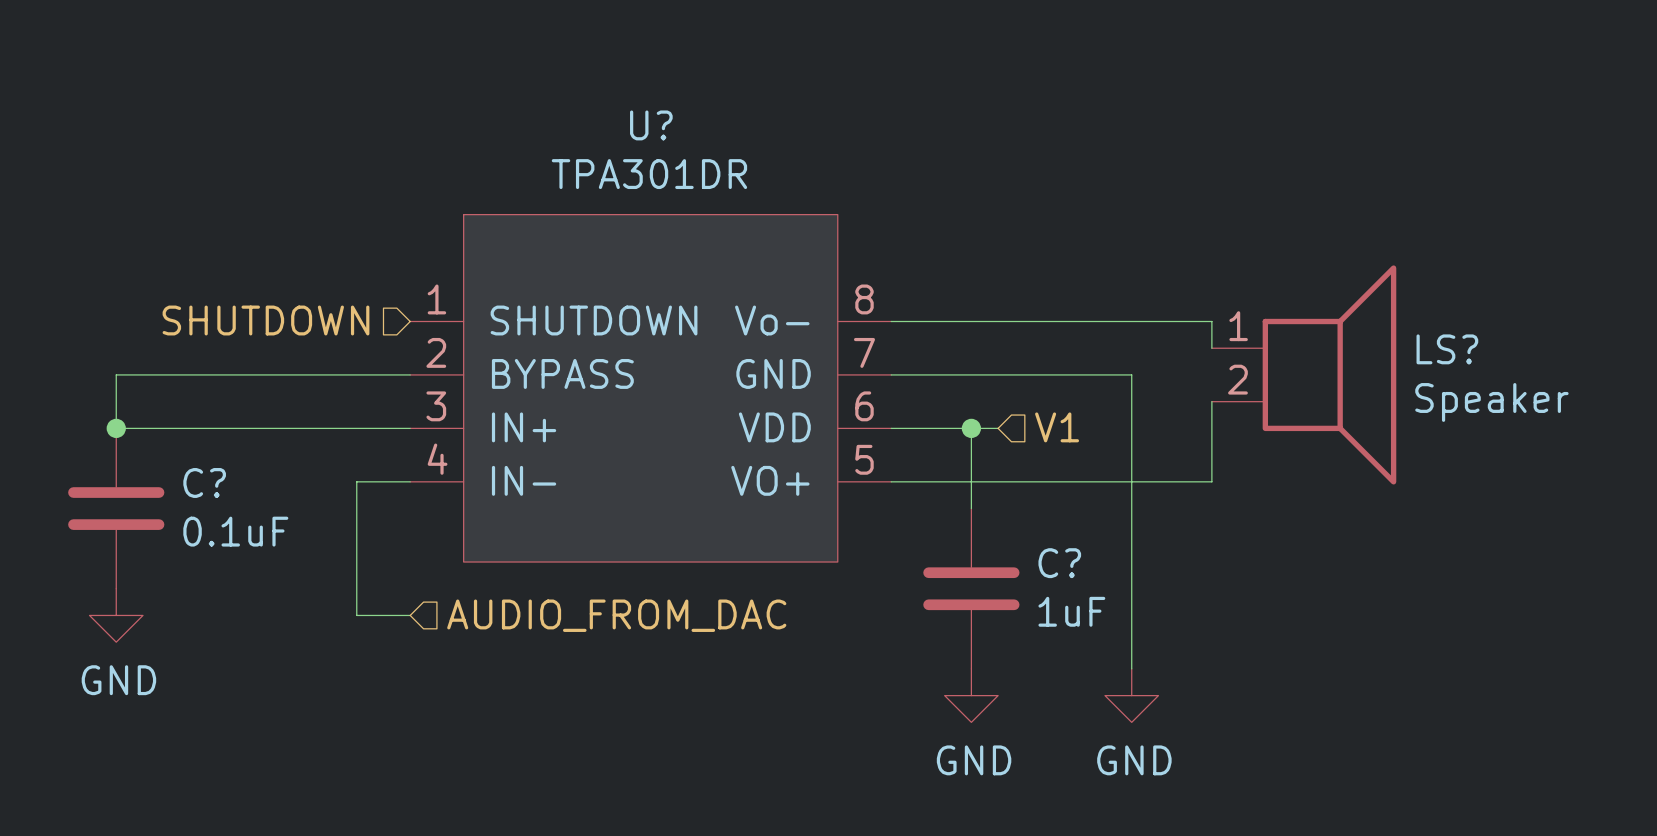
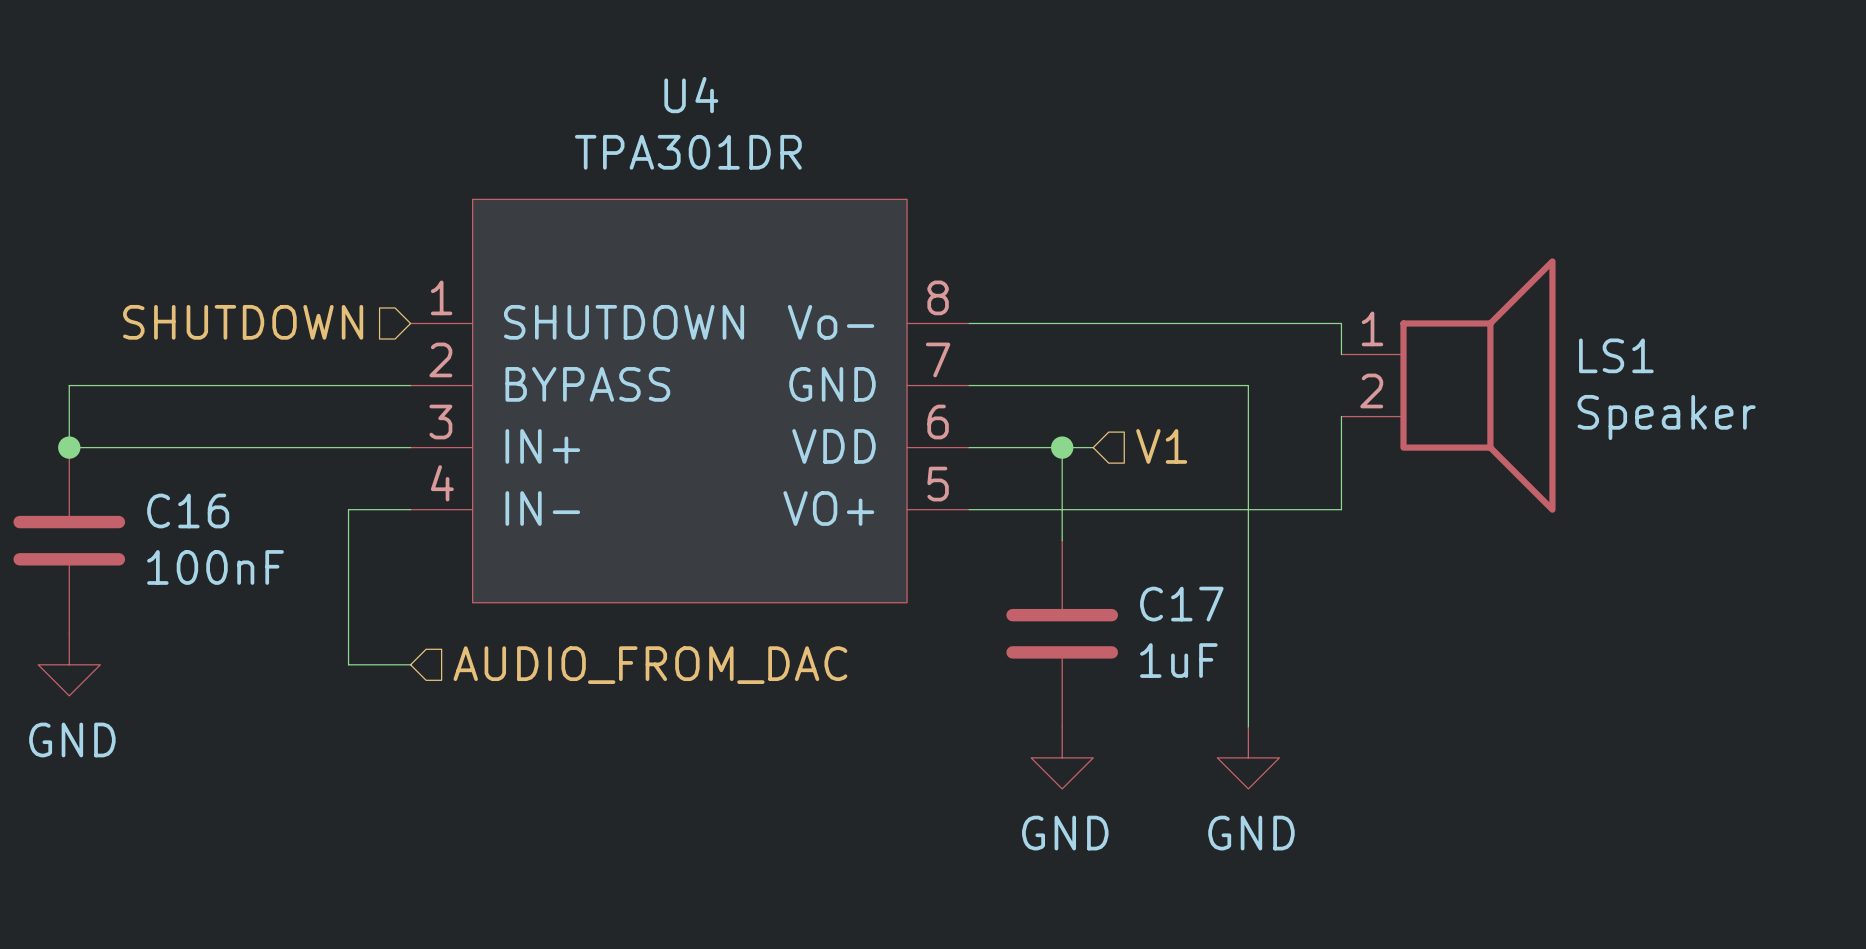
U? name: U? (651, 125) -> U4 (691, 95)
LS? name: LS? (1447, 349) -> LS1 (1616, 355)
C? name: C? (204, 482) -> C16 (188, 510)
C? value: 0.1uF (235, 531) -> 100nF (215, 567)
C? name: C? (1059, 563) -> C17 (1181, 604)

